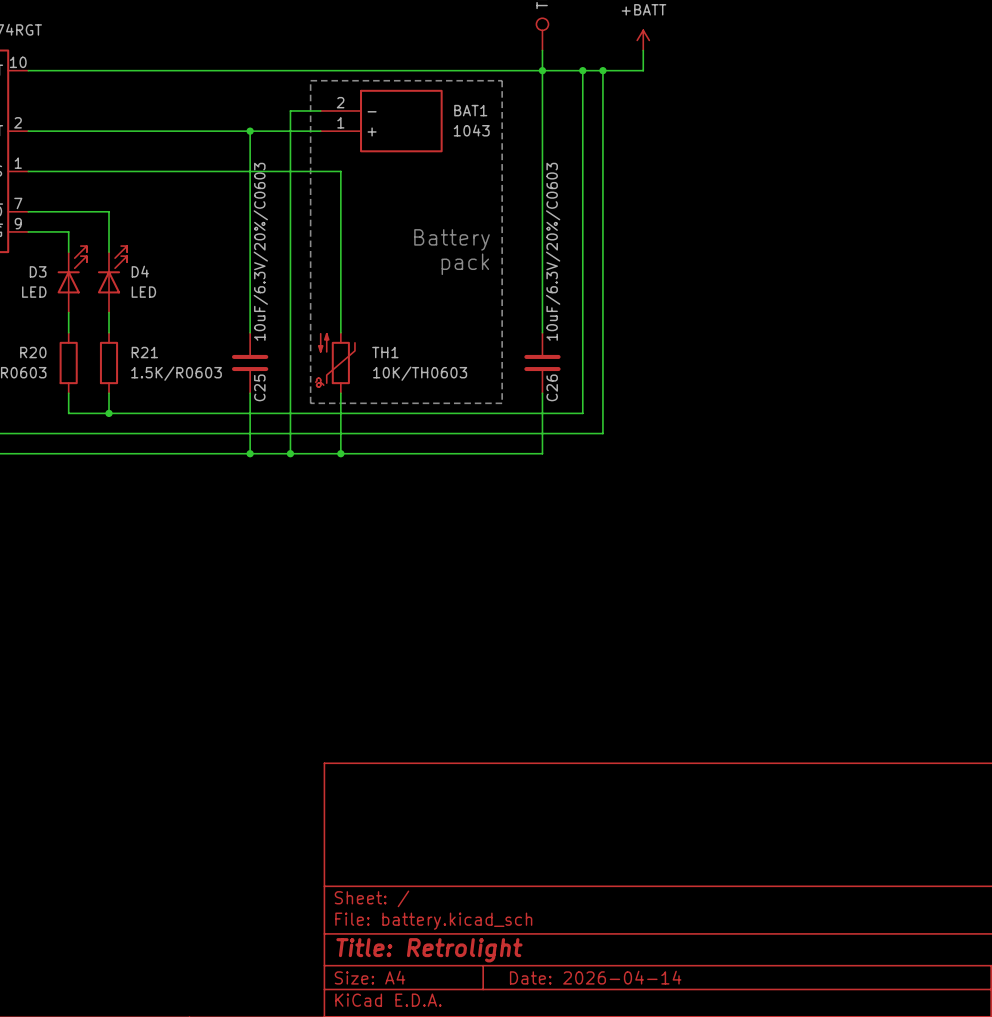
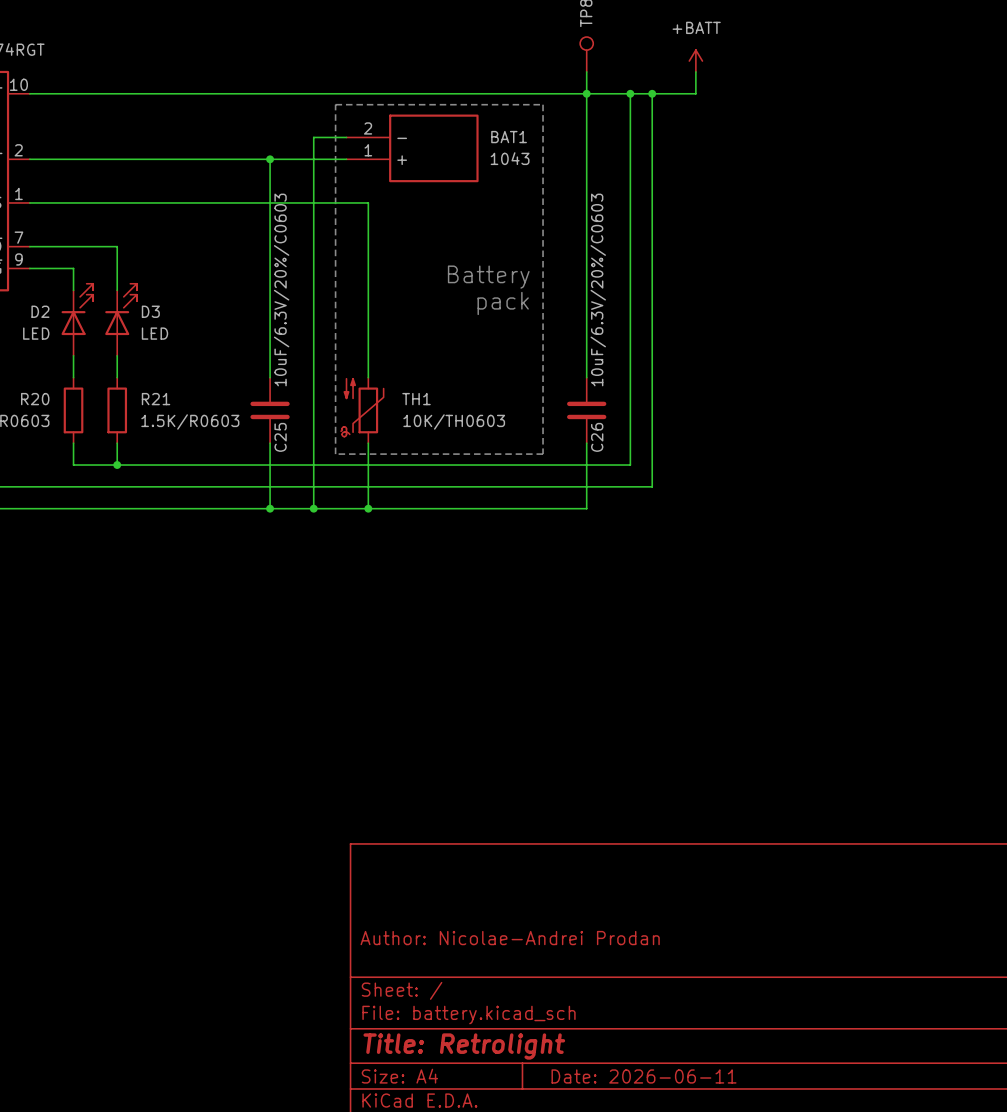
D3 name: D3 (38, 271) -> D2 (40, 311)
D4 name: D4 (140, 271) -> D3 (150, 311)
title block: none -> Author: Nicolae-Andrei Prodan (510, 938)
title block: Date: 2026-04-14 (595, 977) -> Date: 2026-06-11 (644, 1076)

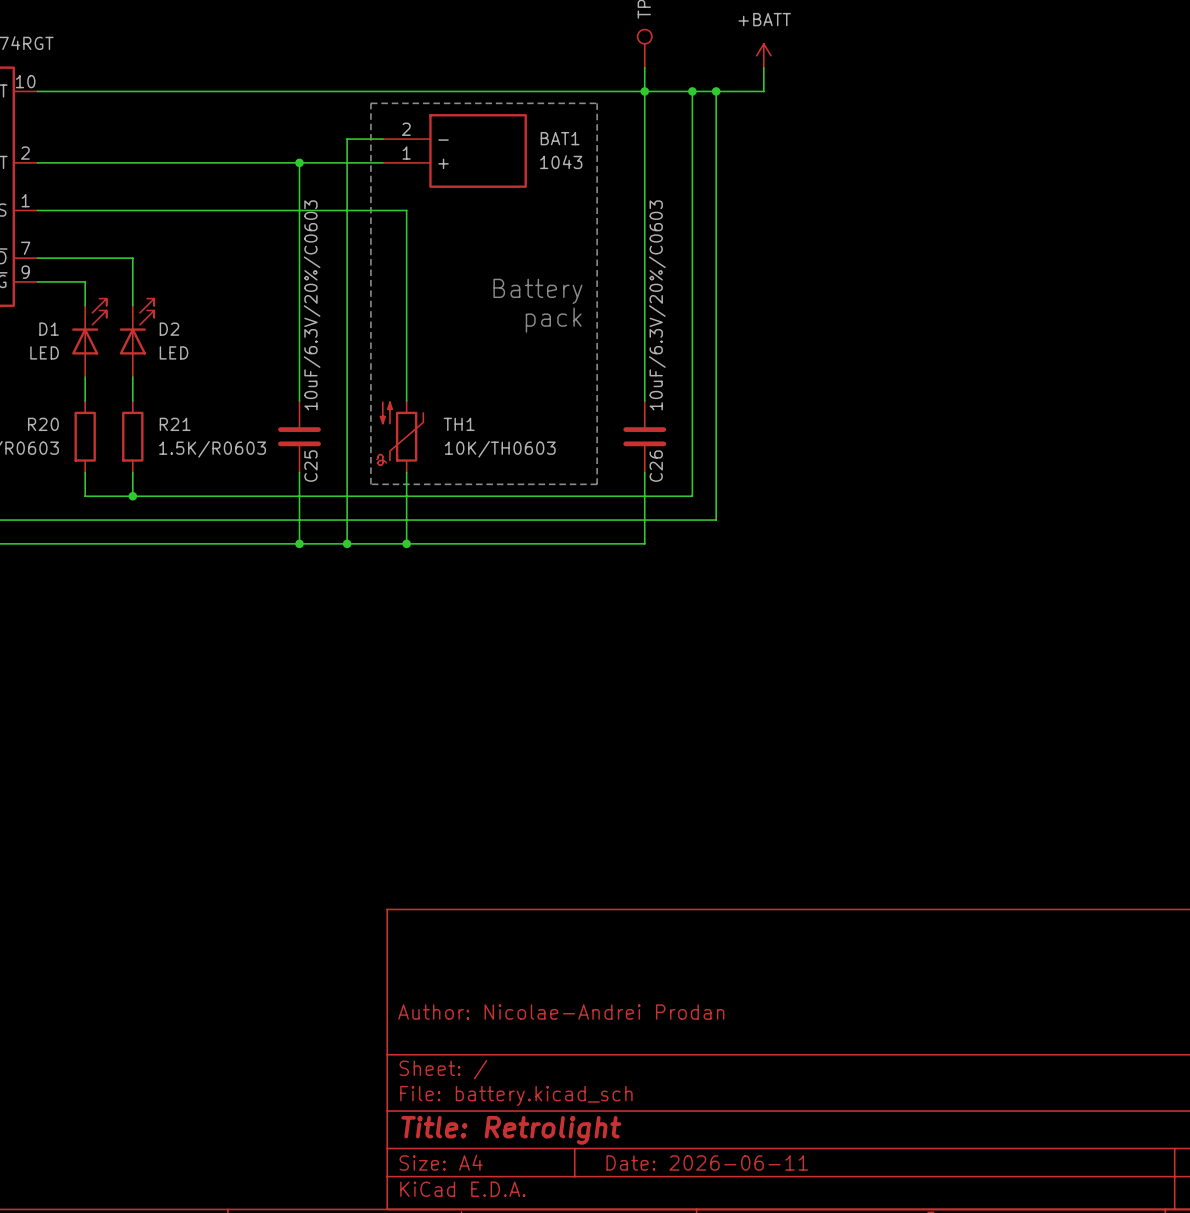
D2 name: D2 (40, 311) -> D1 (49, 329)
D3 name: D3 (150, 311) -> D2 (169, 329)

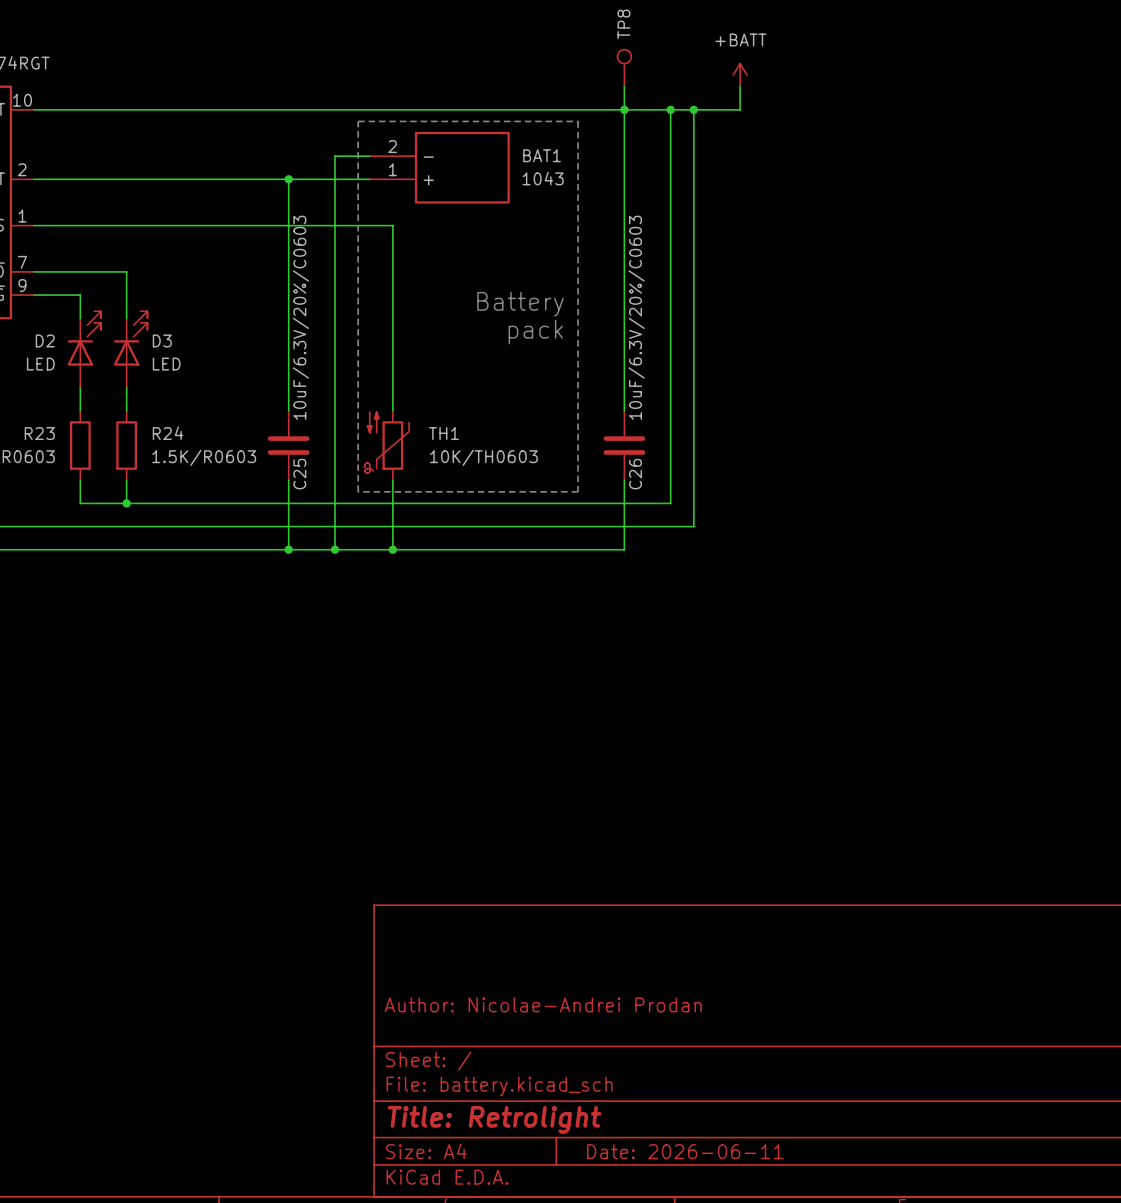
D1 name: D1 (49, 329) -> D2 (45, 340)
D2 name: D2 (169, 329) -> D3 (162, 340)
R20 name: R20 (43, 424) -> R23 (39, 433)
R21 name: R21 (175, 424) -> R24 (168, 433)

